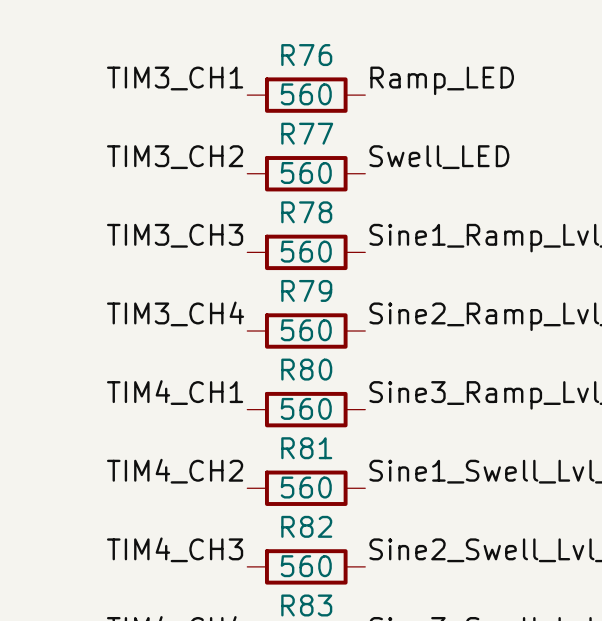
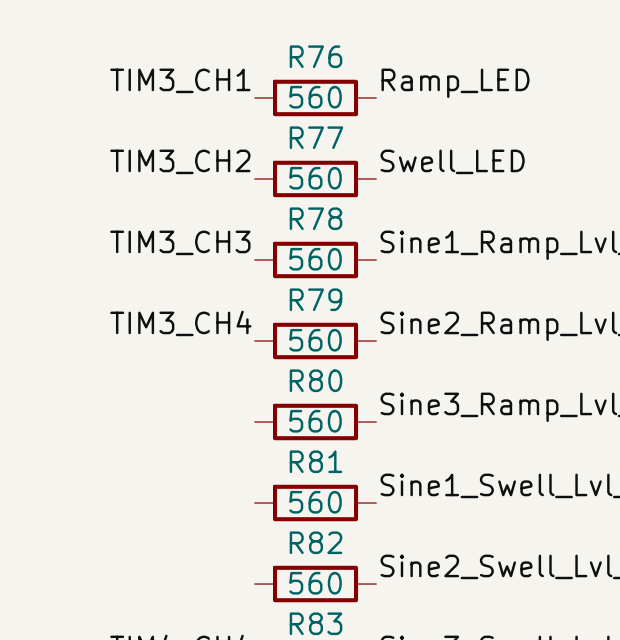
label: TIM4_CH1 (175, 392) -> none
label: TIM4_CH2 (175, 471) -> none
label: TIM4_CH3 (175, 549) -> none

